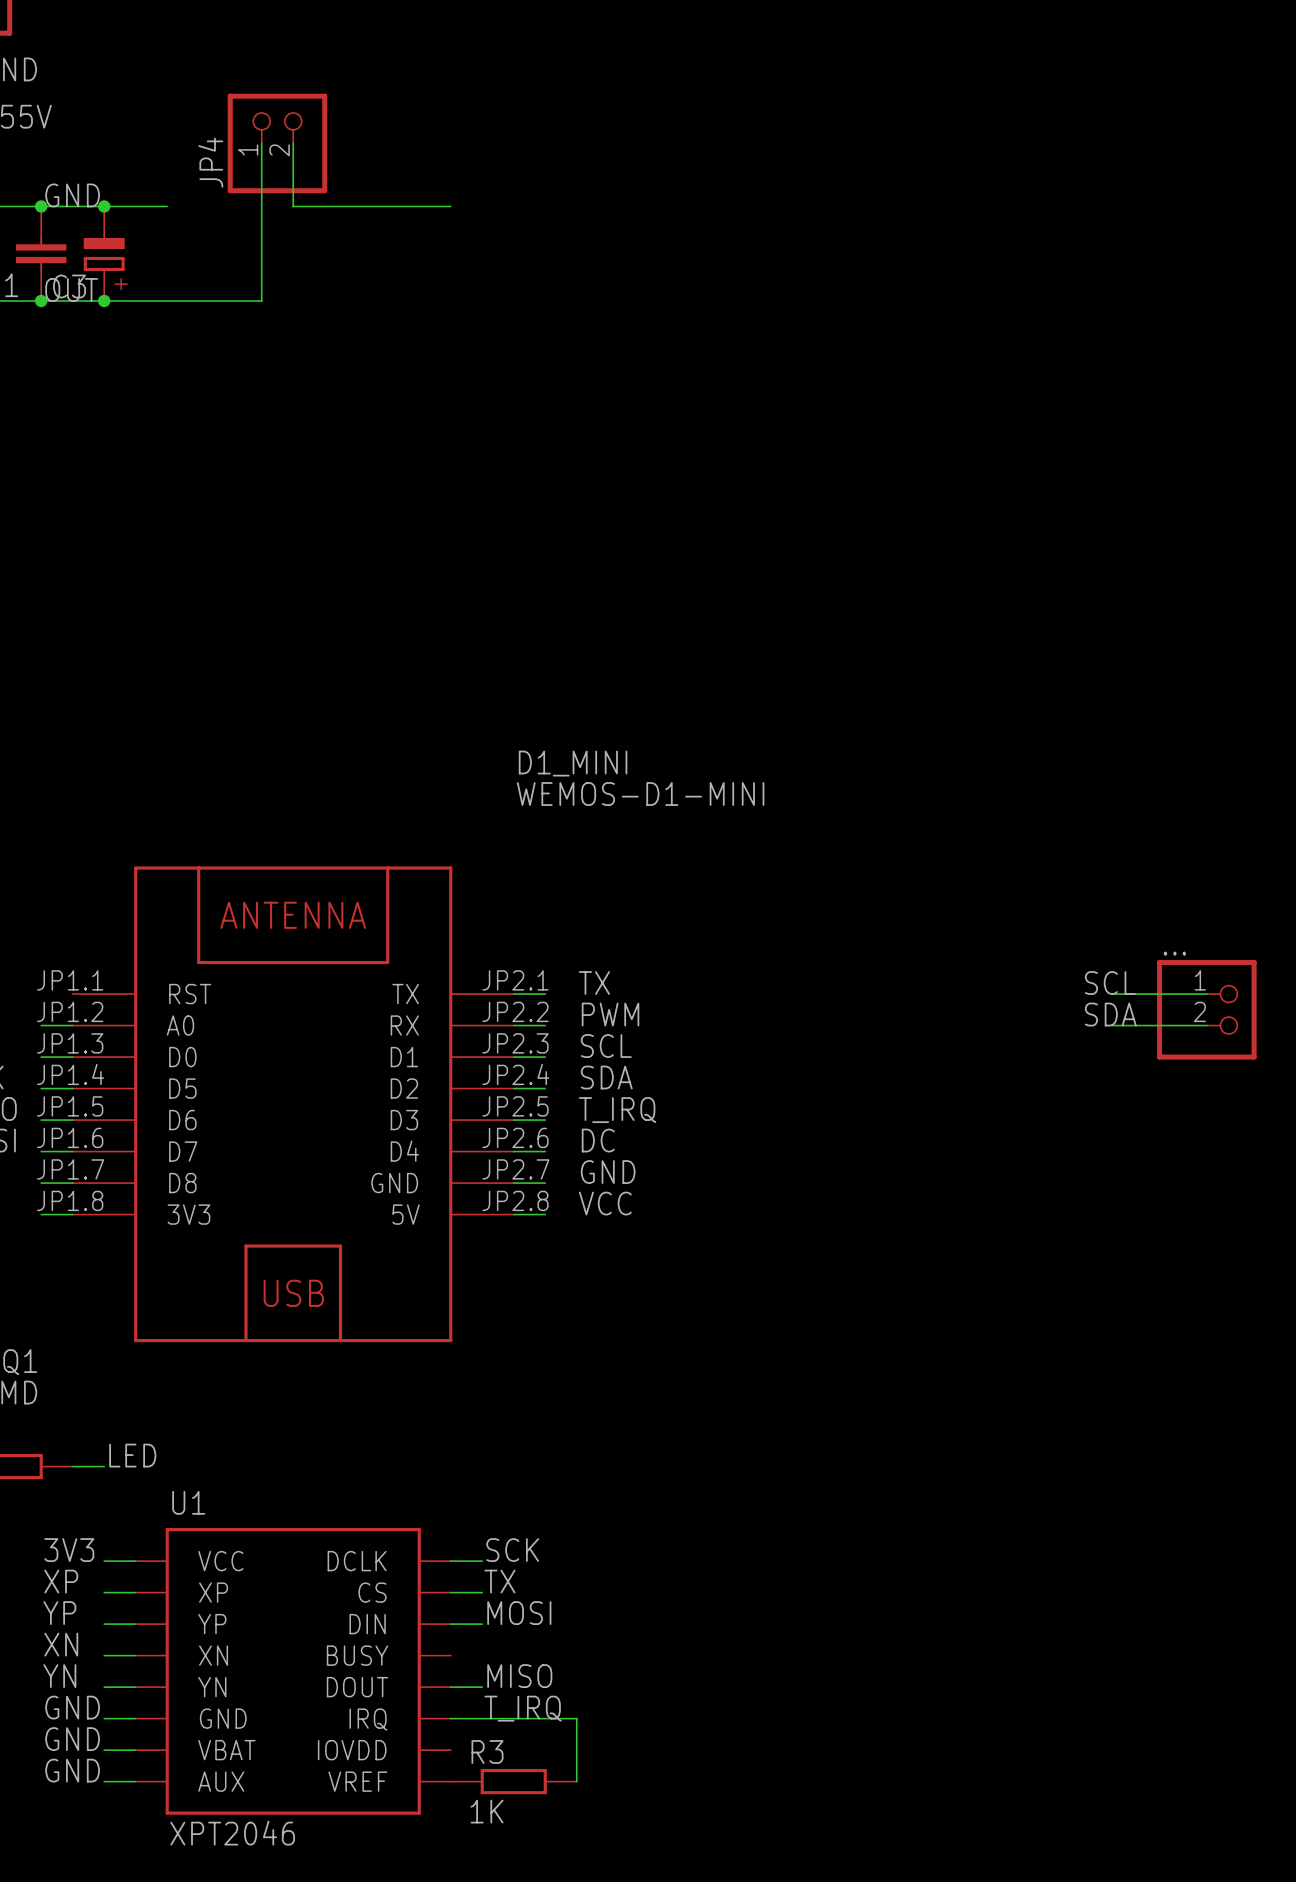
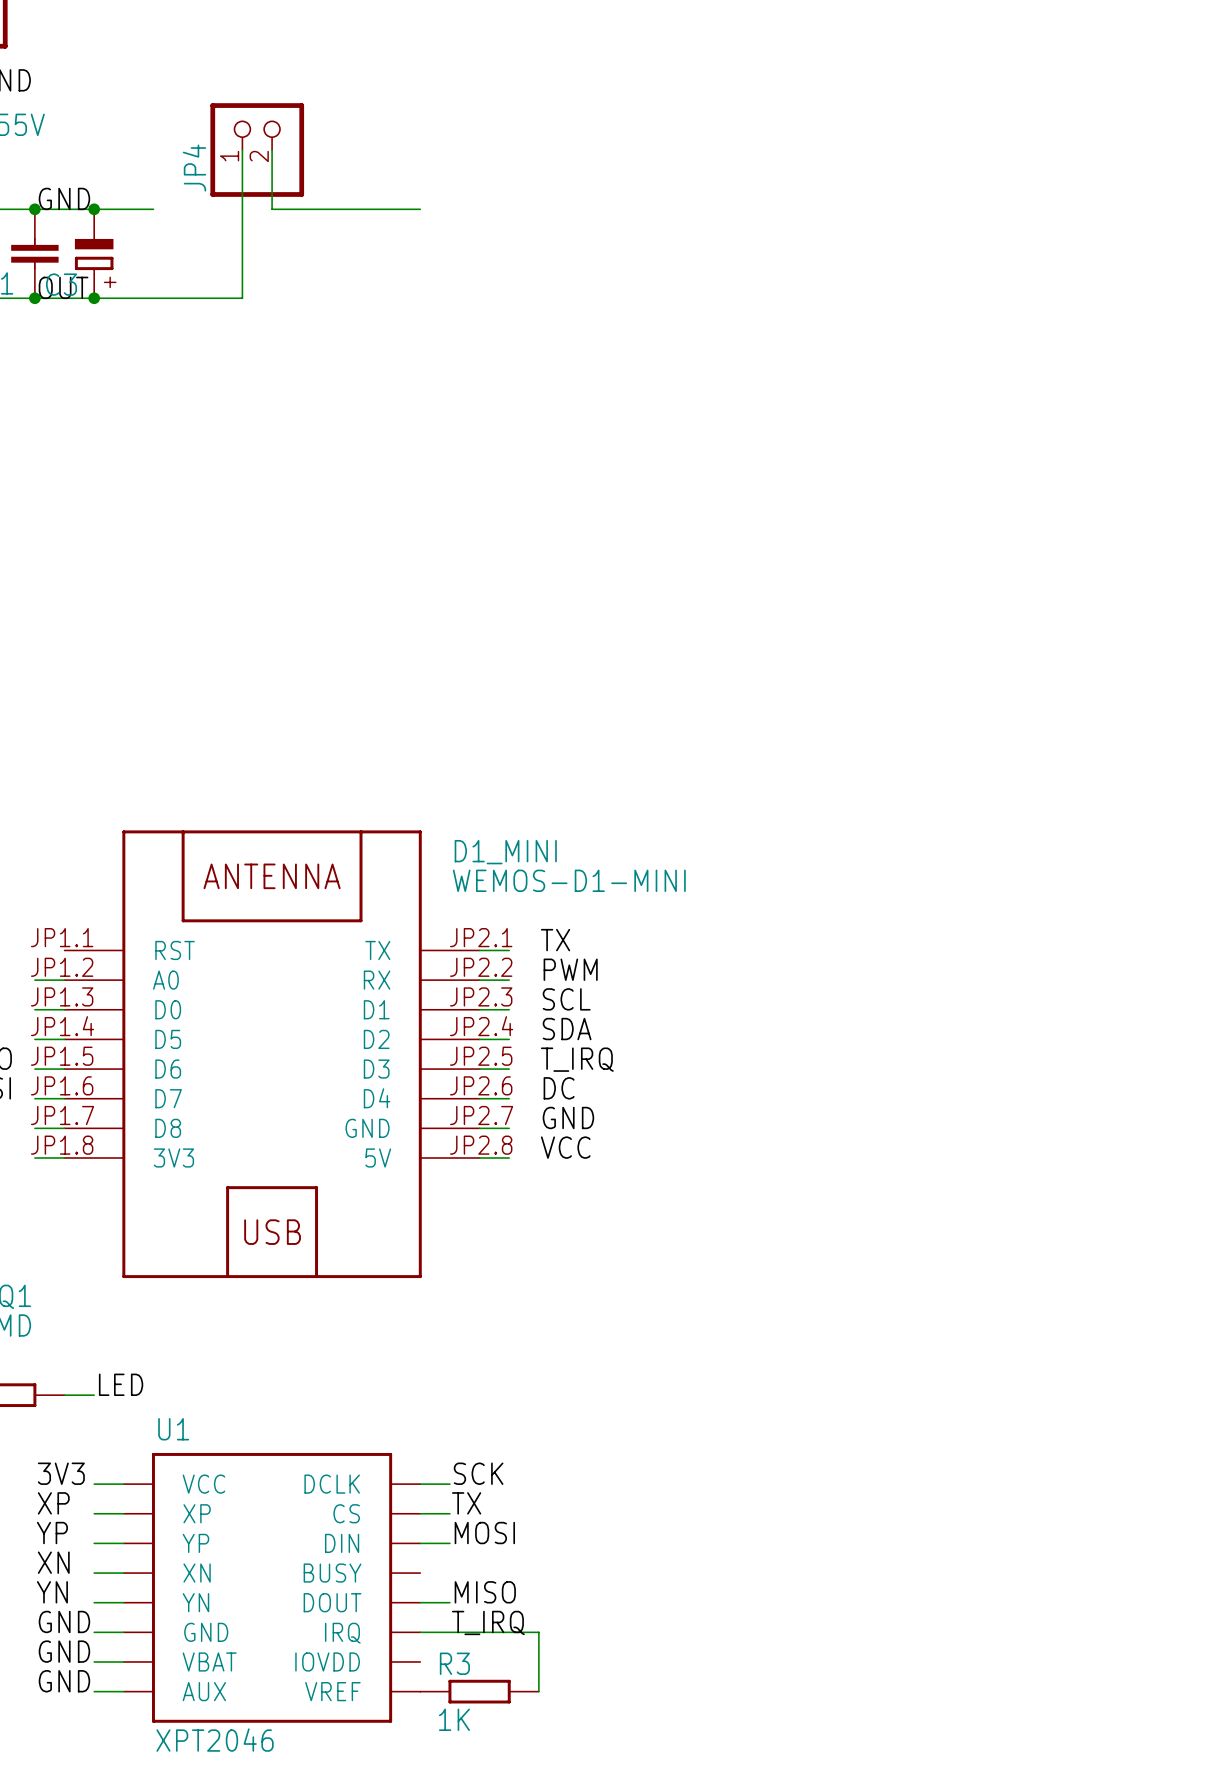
D1_MINI name position: D1_MINI (573, 763) -> D1_MINI (505, 852)
D1_MINI value position: WEMOS-D1-MINI (640, 794) -> WEMOS-D1-MINI (569, 880)
label: SCL (1110, 983) -> none
wire: (1112, 994) (1206, 994) -> none
part: (1206, 1009) -> none
label: SDA (1110, 1014) -> none
wire: (1112, 1025) (1206, 1025) -> none

